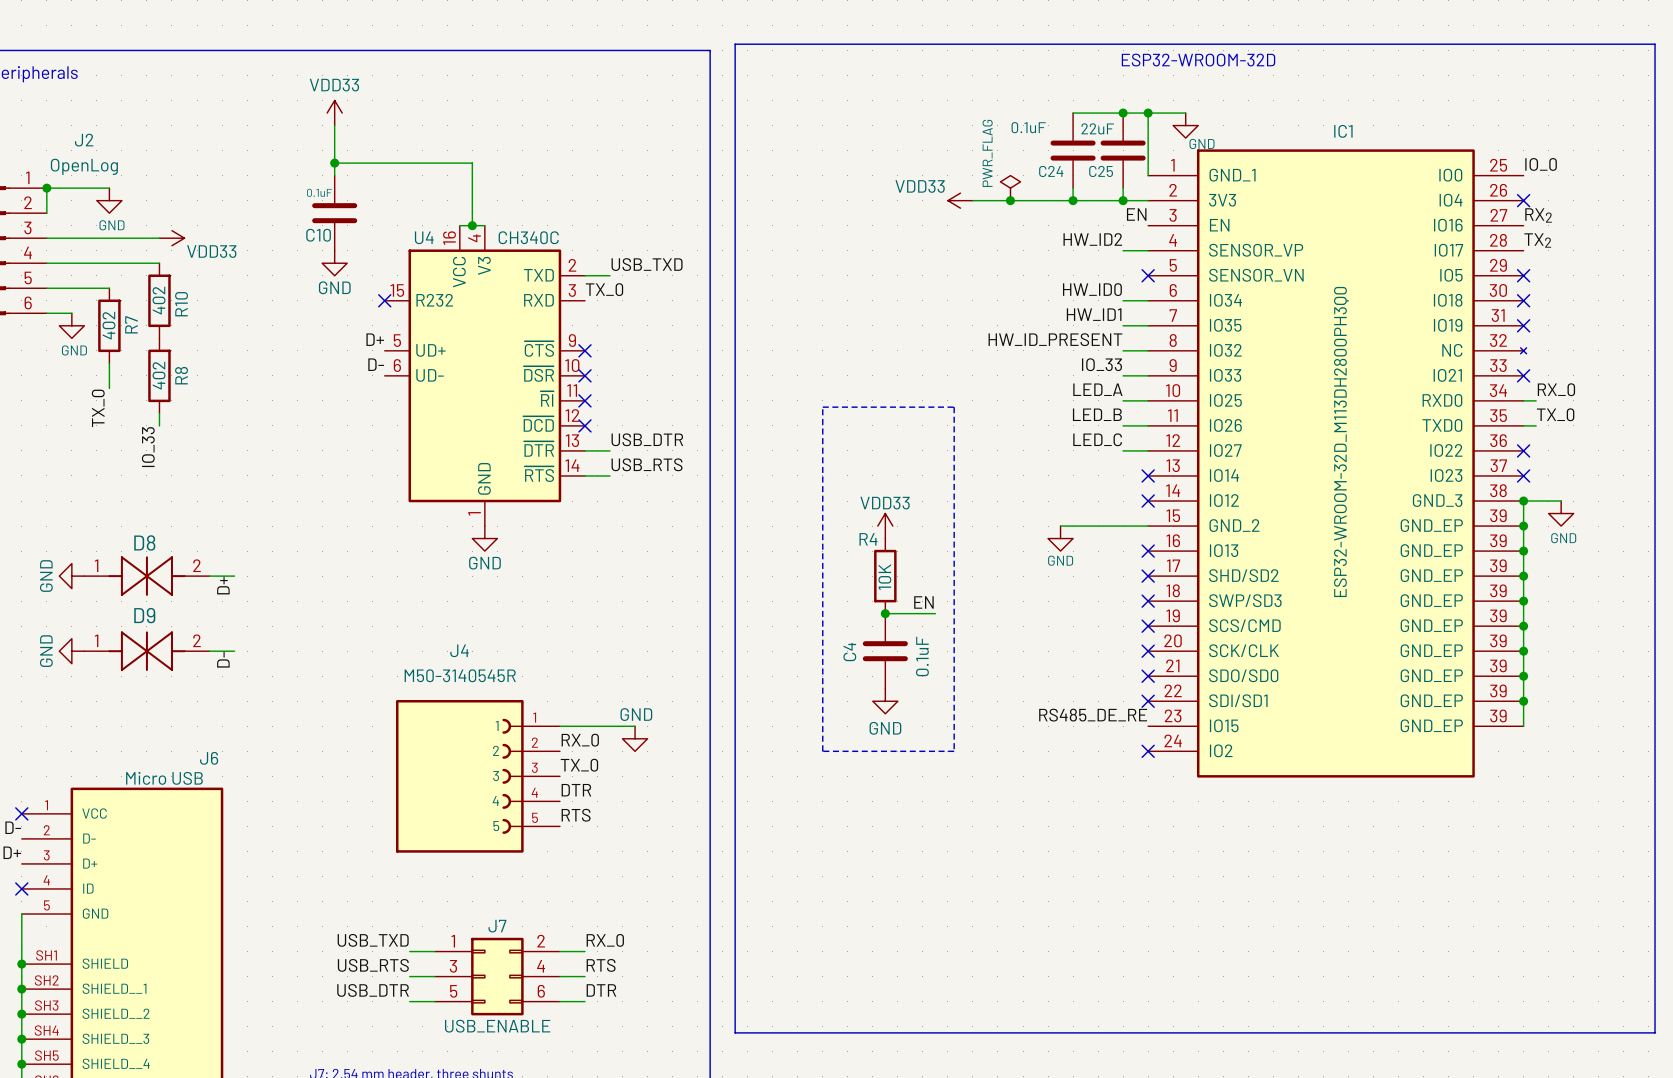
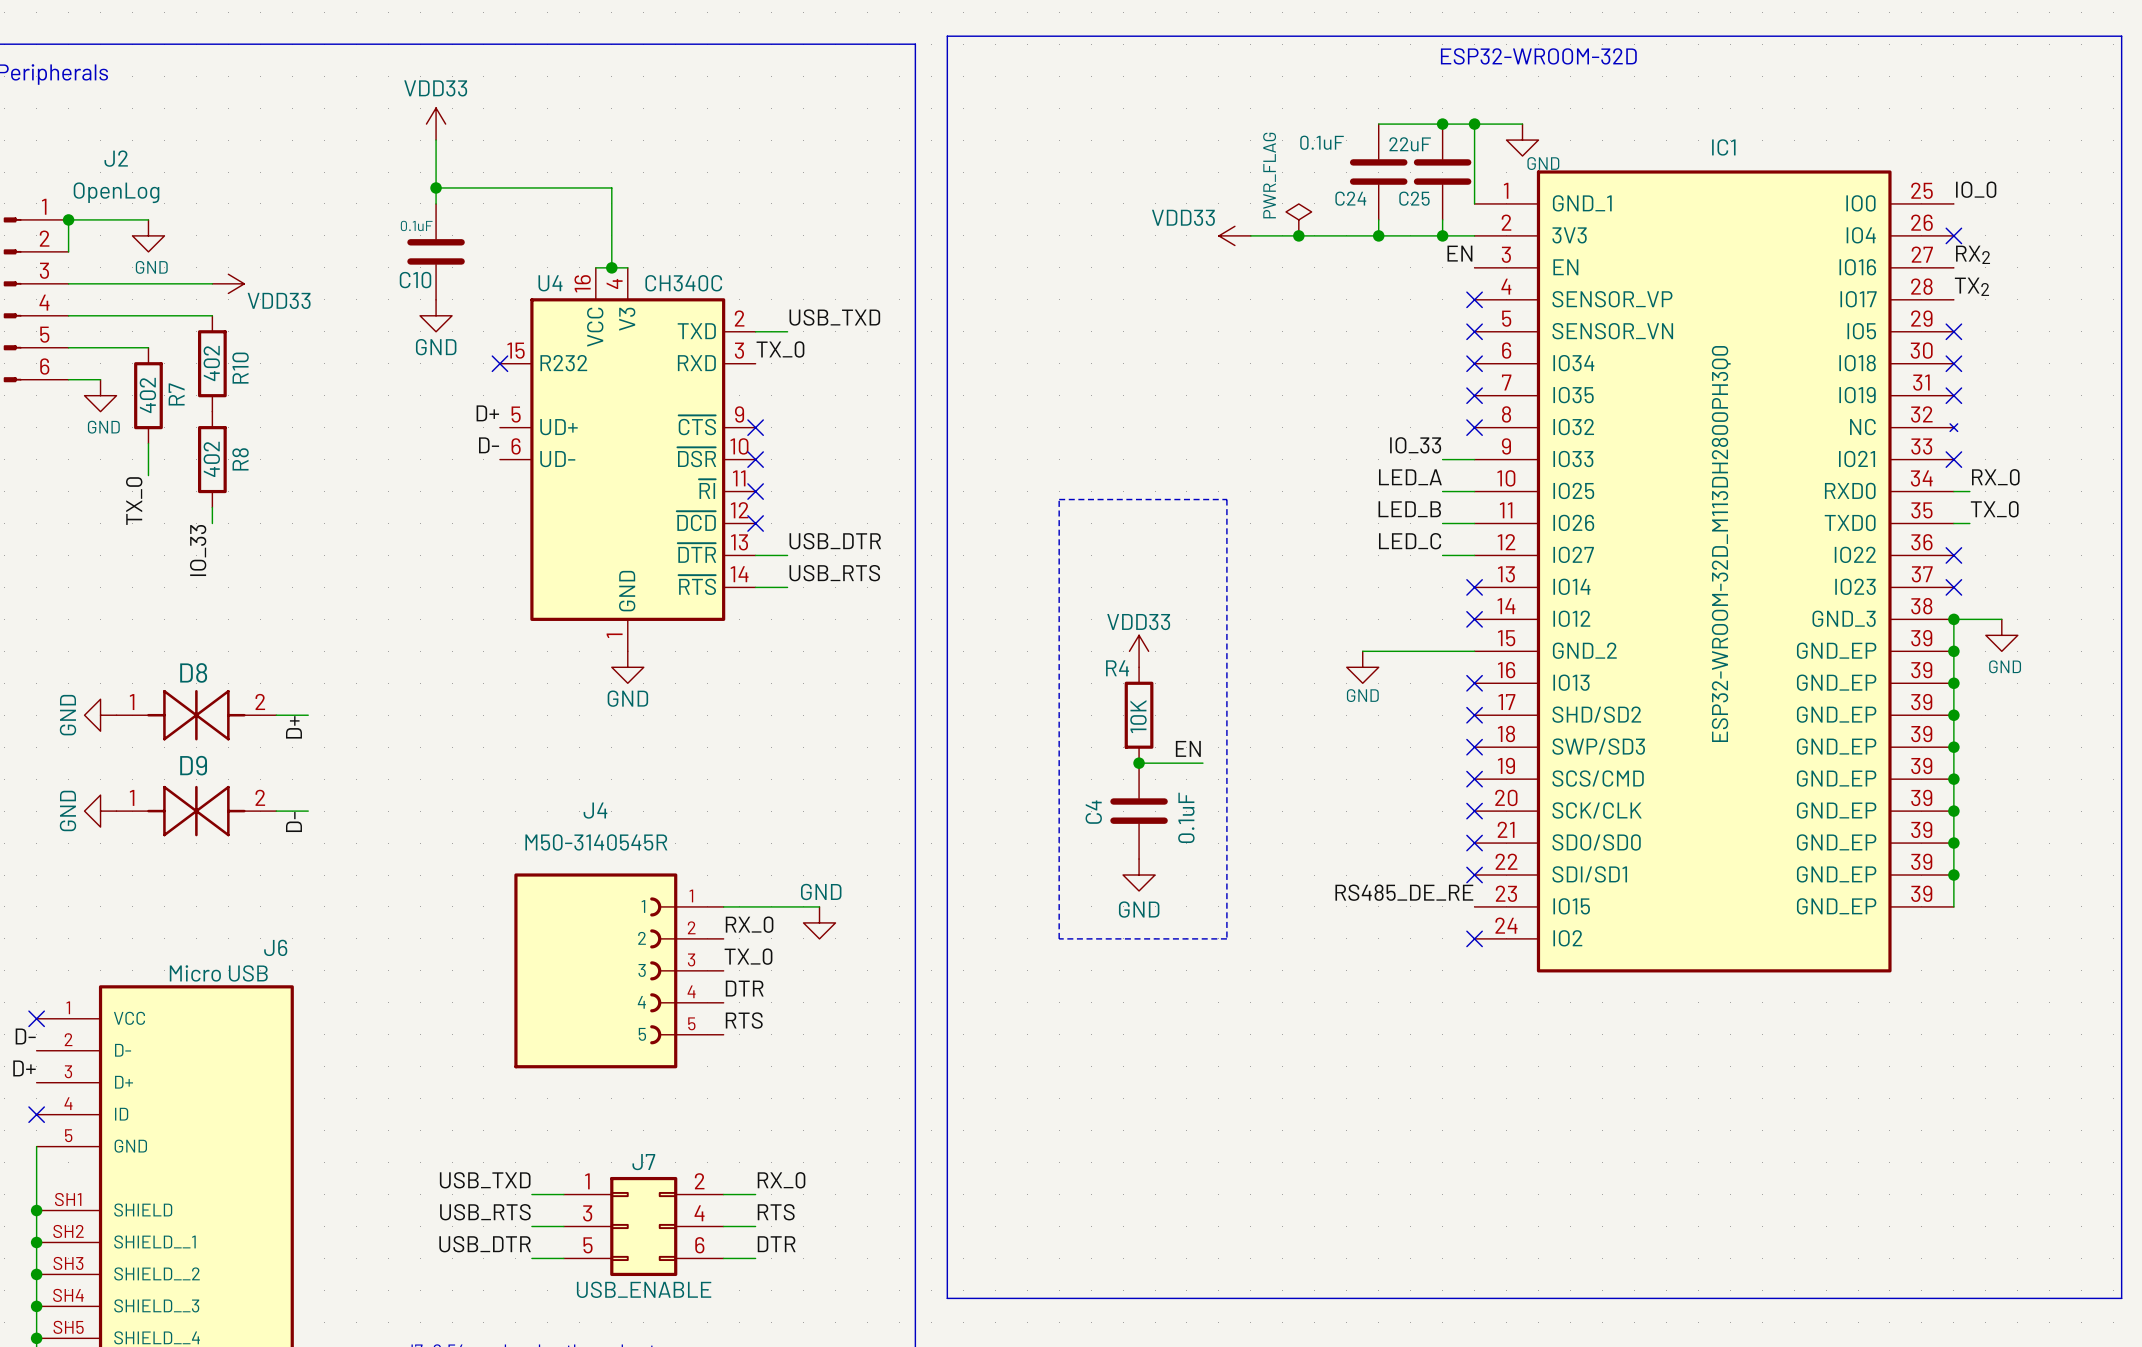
label: HW_ID2 (1092, 239) -> none
wire: (1123, 250) (1148, 250) -> none
no-connect mark: none -> (1474, 299)
label: HW_ID0 (1092, 289) -> none
wire: (1123, 300) (1148, 300) -> none
no-connect mark: none -> (1474, 363)
label: HW_ID1 (1094, 314) -> none
wire: (1123, 325) (1148, 325) -> none
no-connect mark: none -> (1474, 395)
label: HW_ID_PRESENT (1055, 339) -> none
wire: (1123, 350) (1148, 350) -> none
no-connect mark: none -> (1474, 427)

